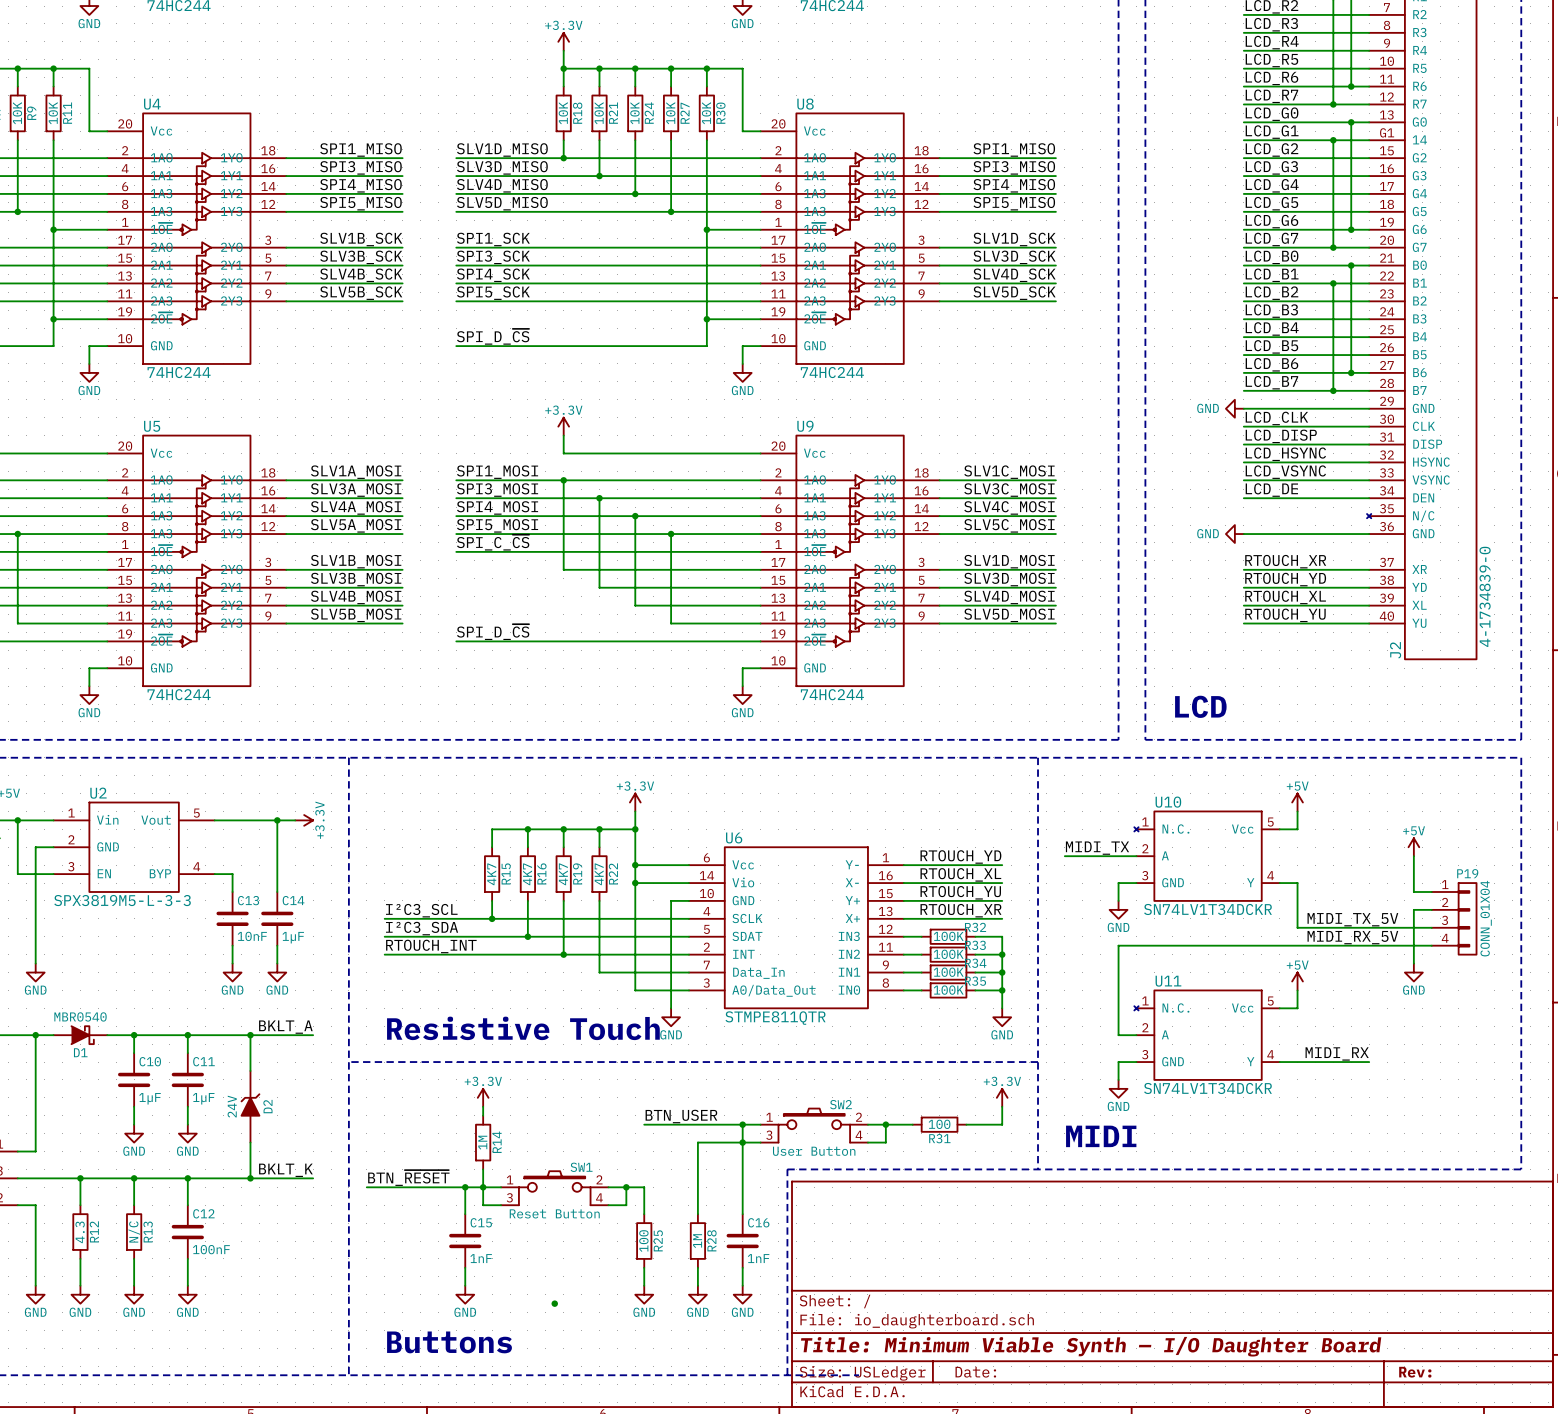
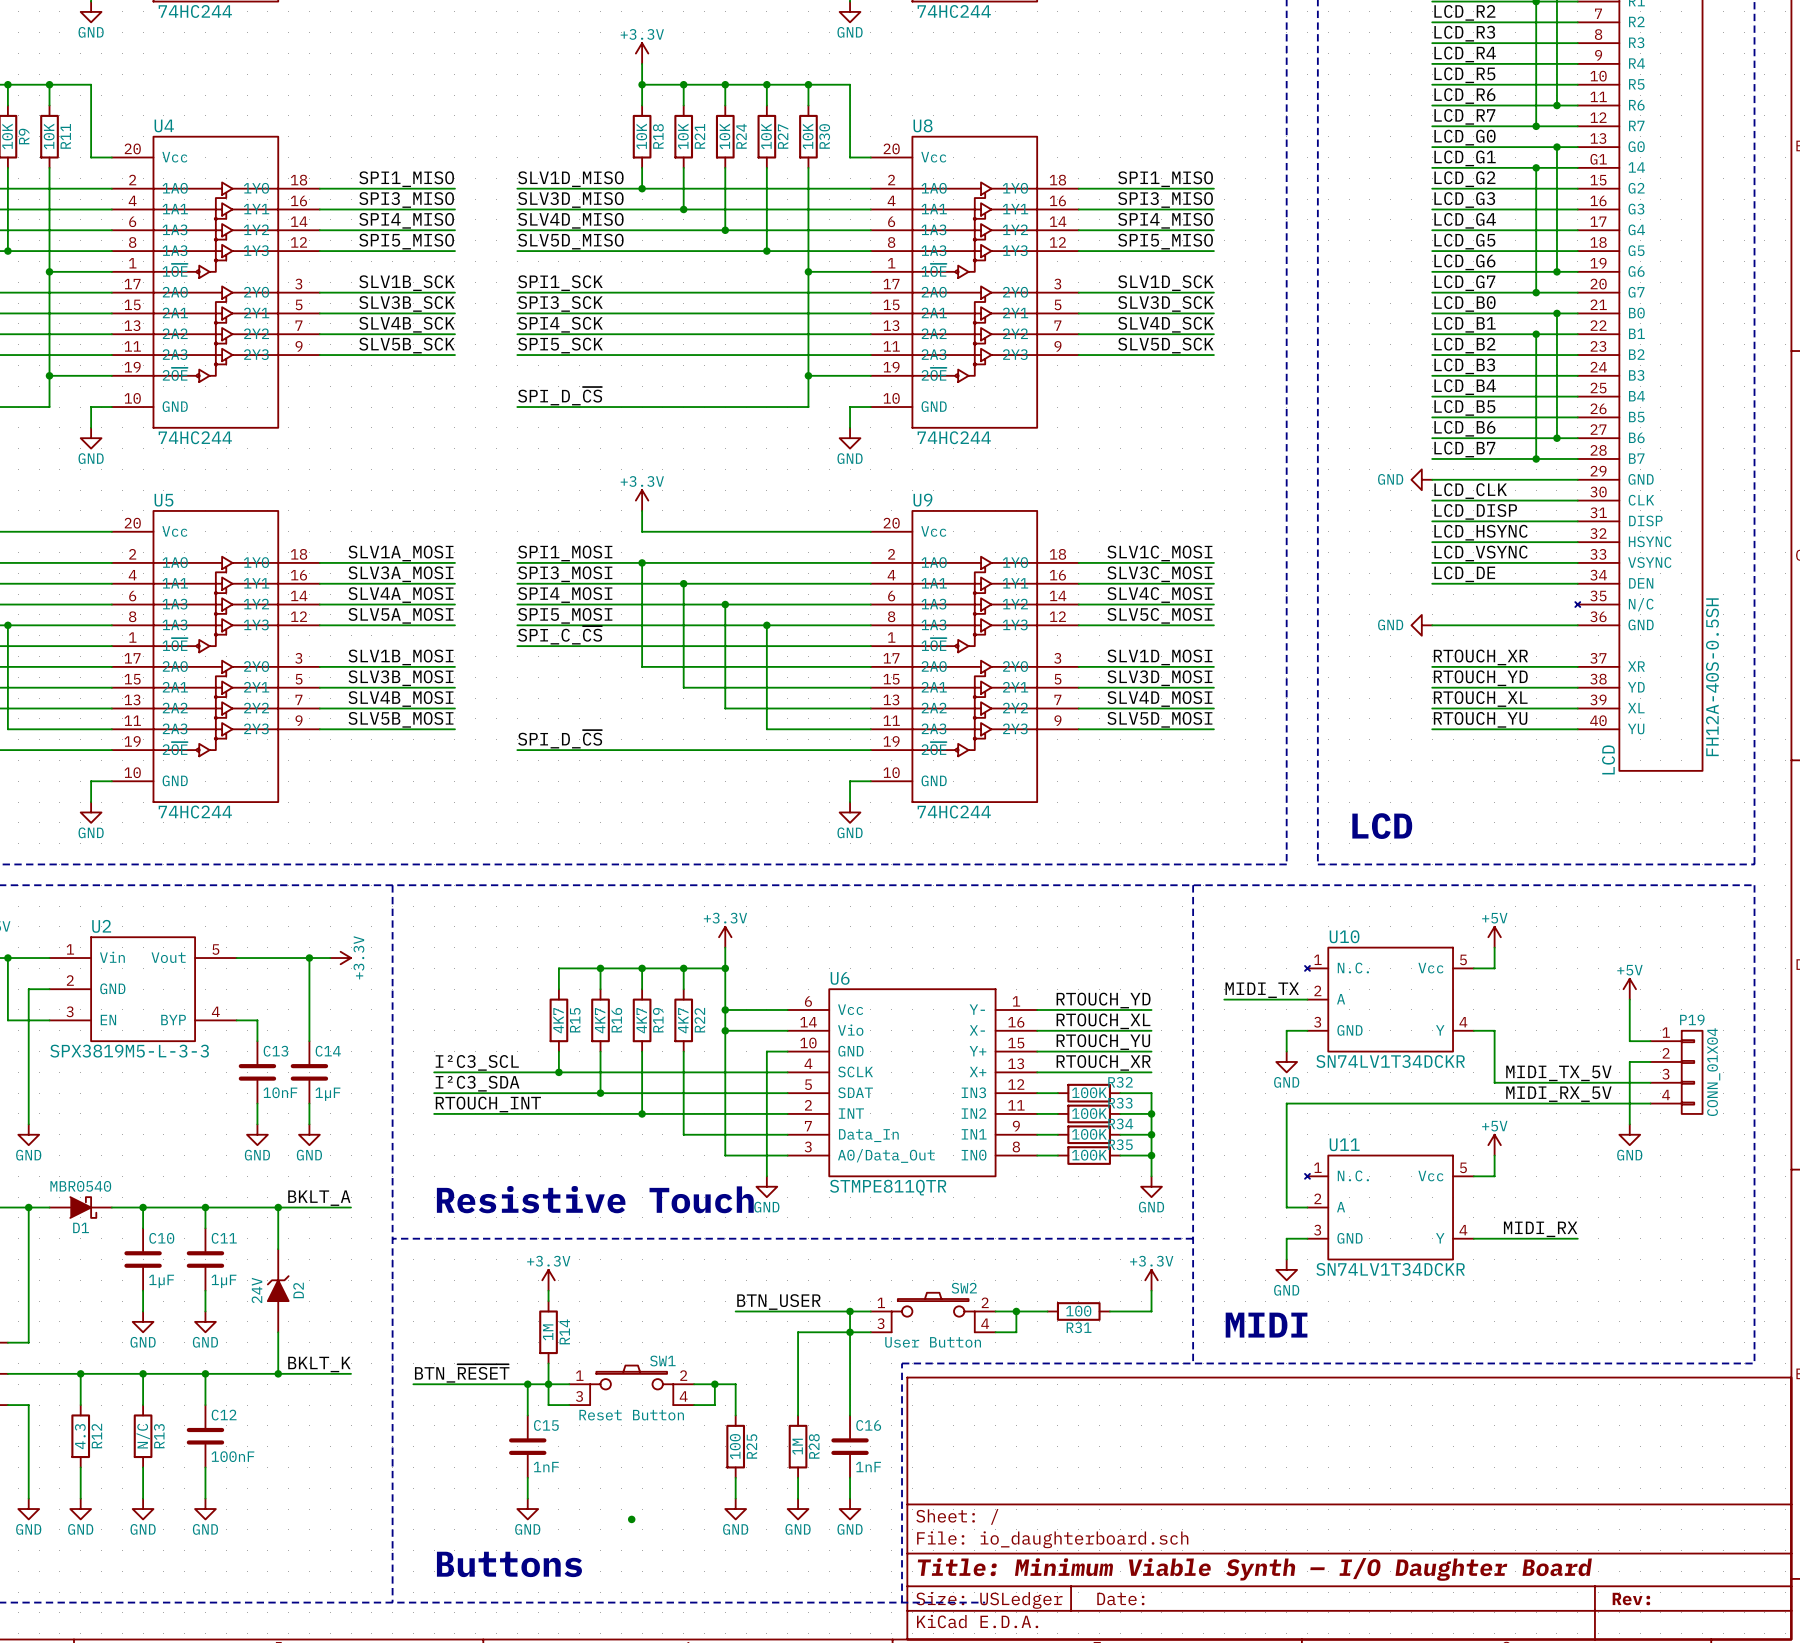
J2 value: 4-1734839-0 (1485, 596) -> FH12A-40S-0.5SH (1712, 677)
J2 name: J2 (1395, 650) -> LCD (1608, 759)

